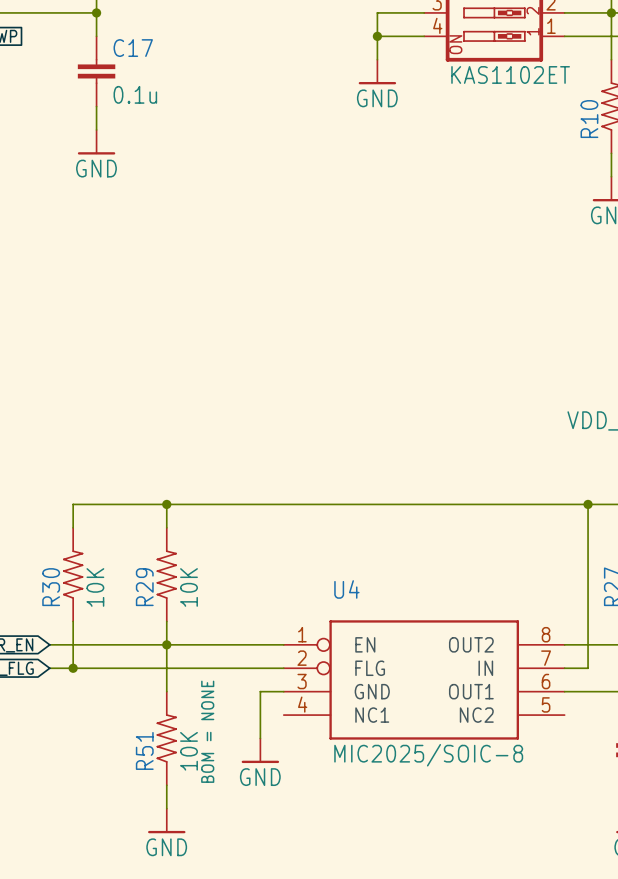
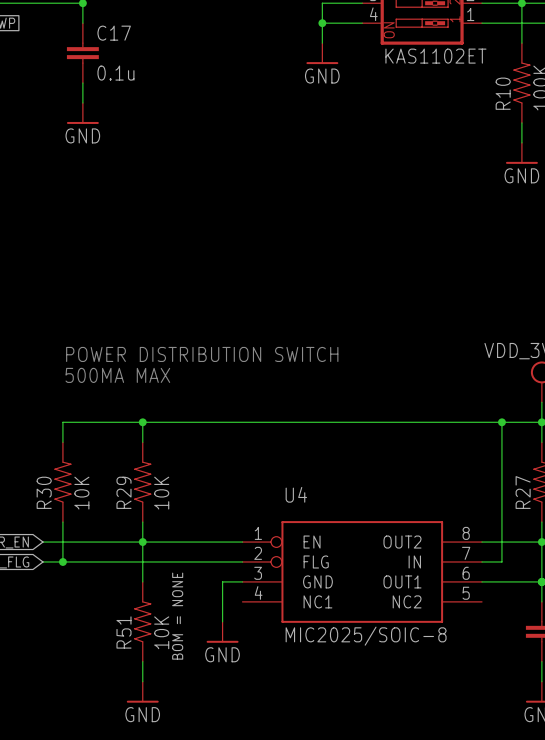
text: none -> POWER DISTRIBUTION SWITCH (202, 354)
text: none -> 500MA MAX (117, 375)

